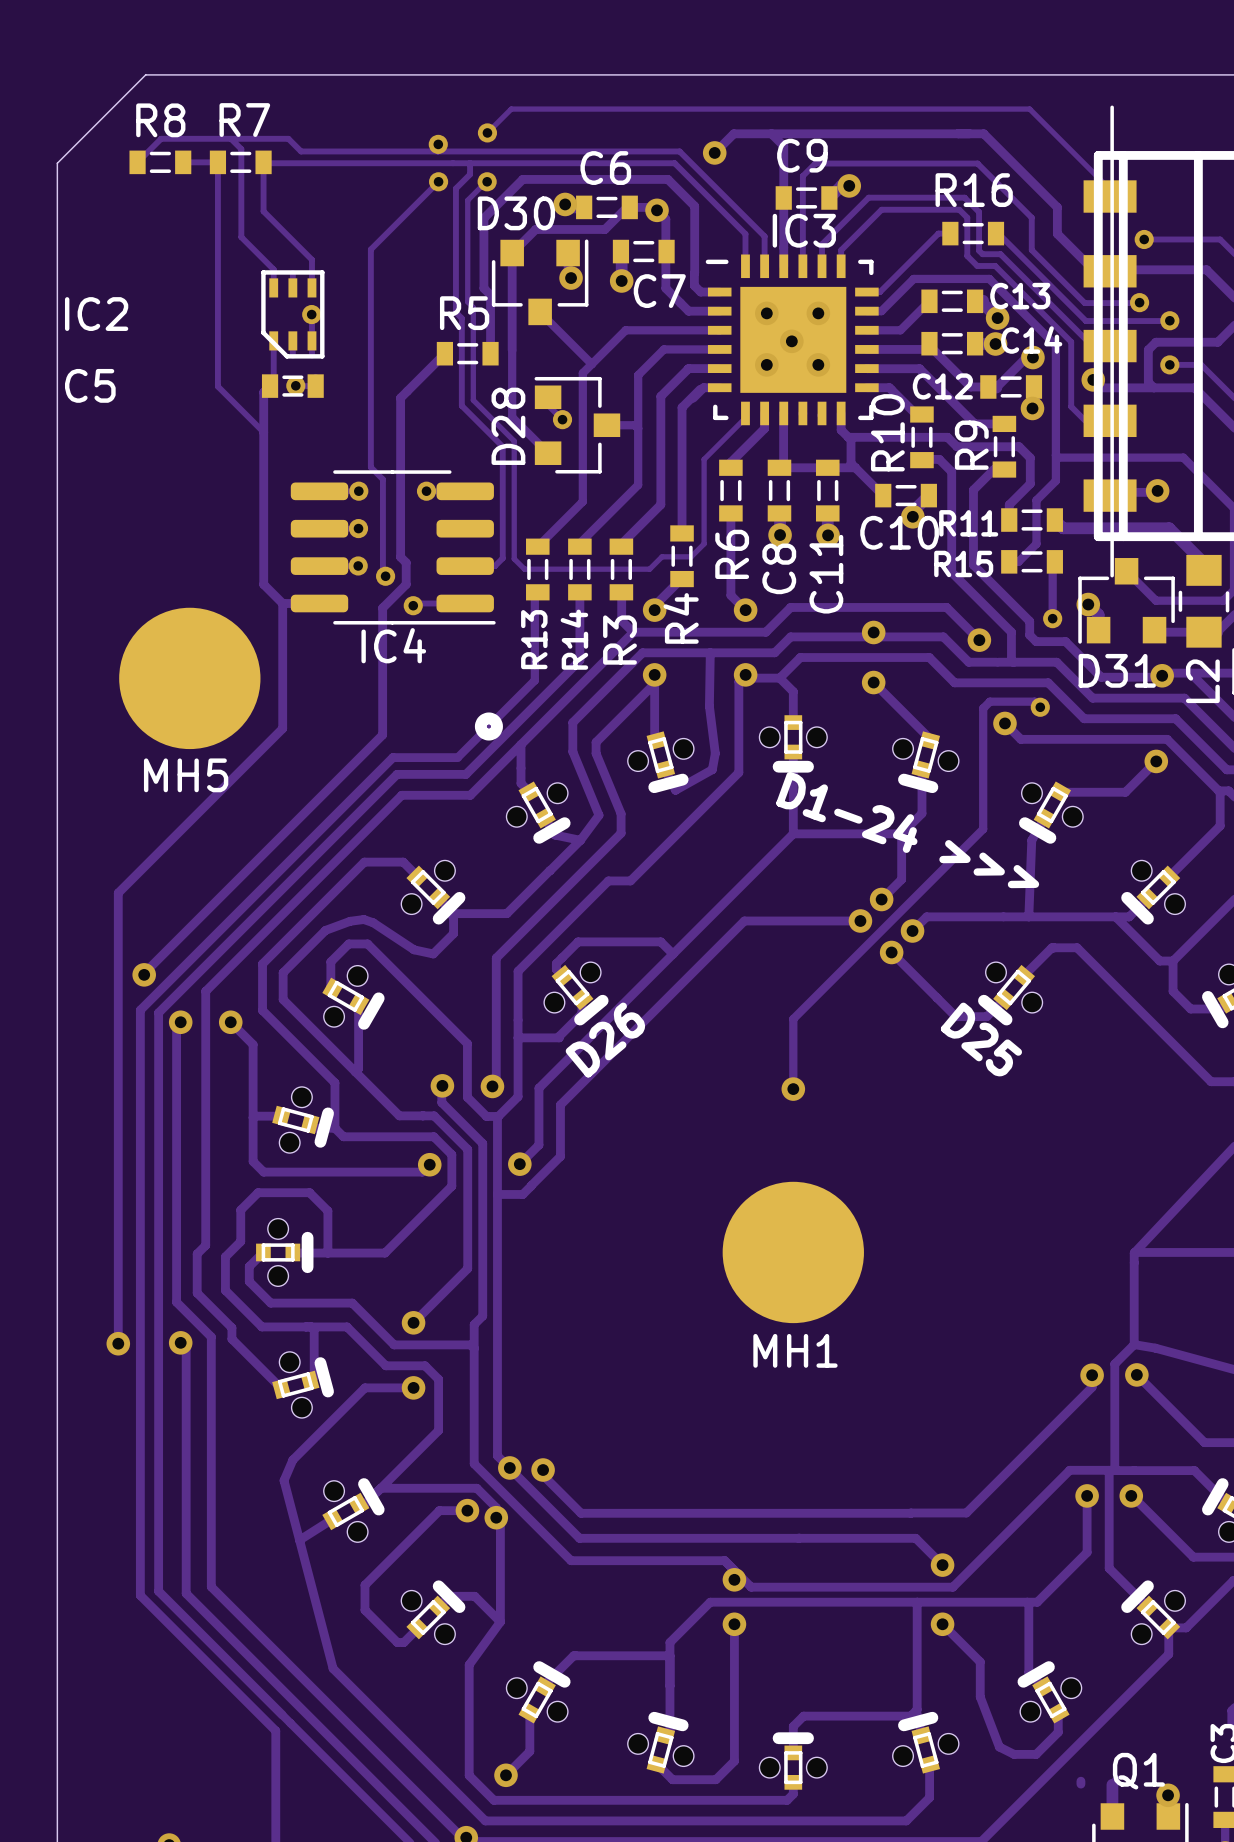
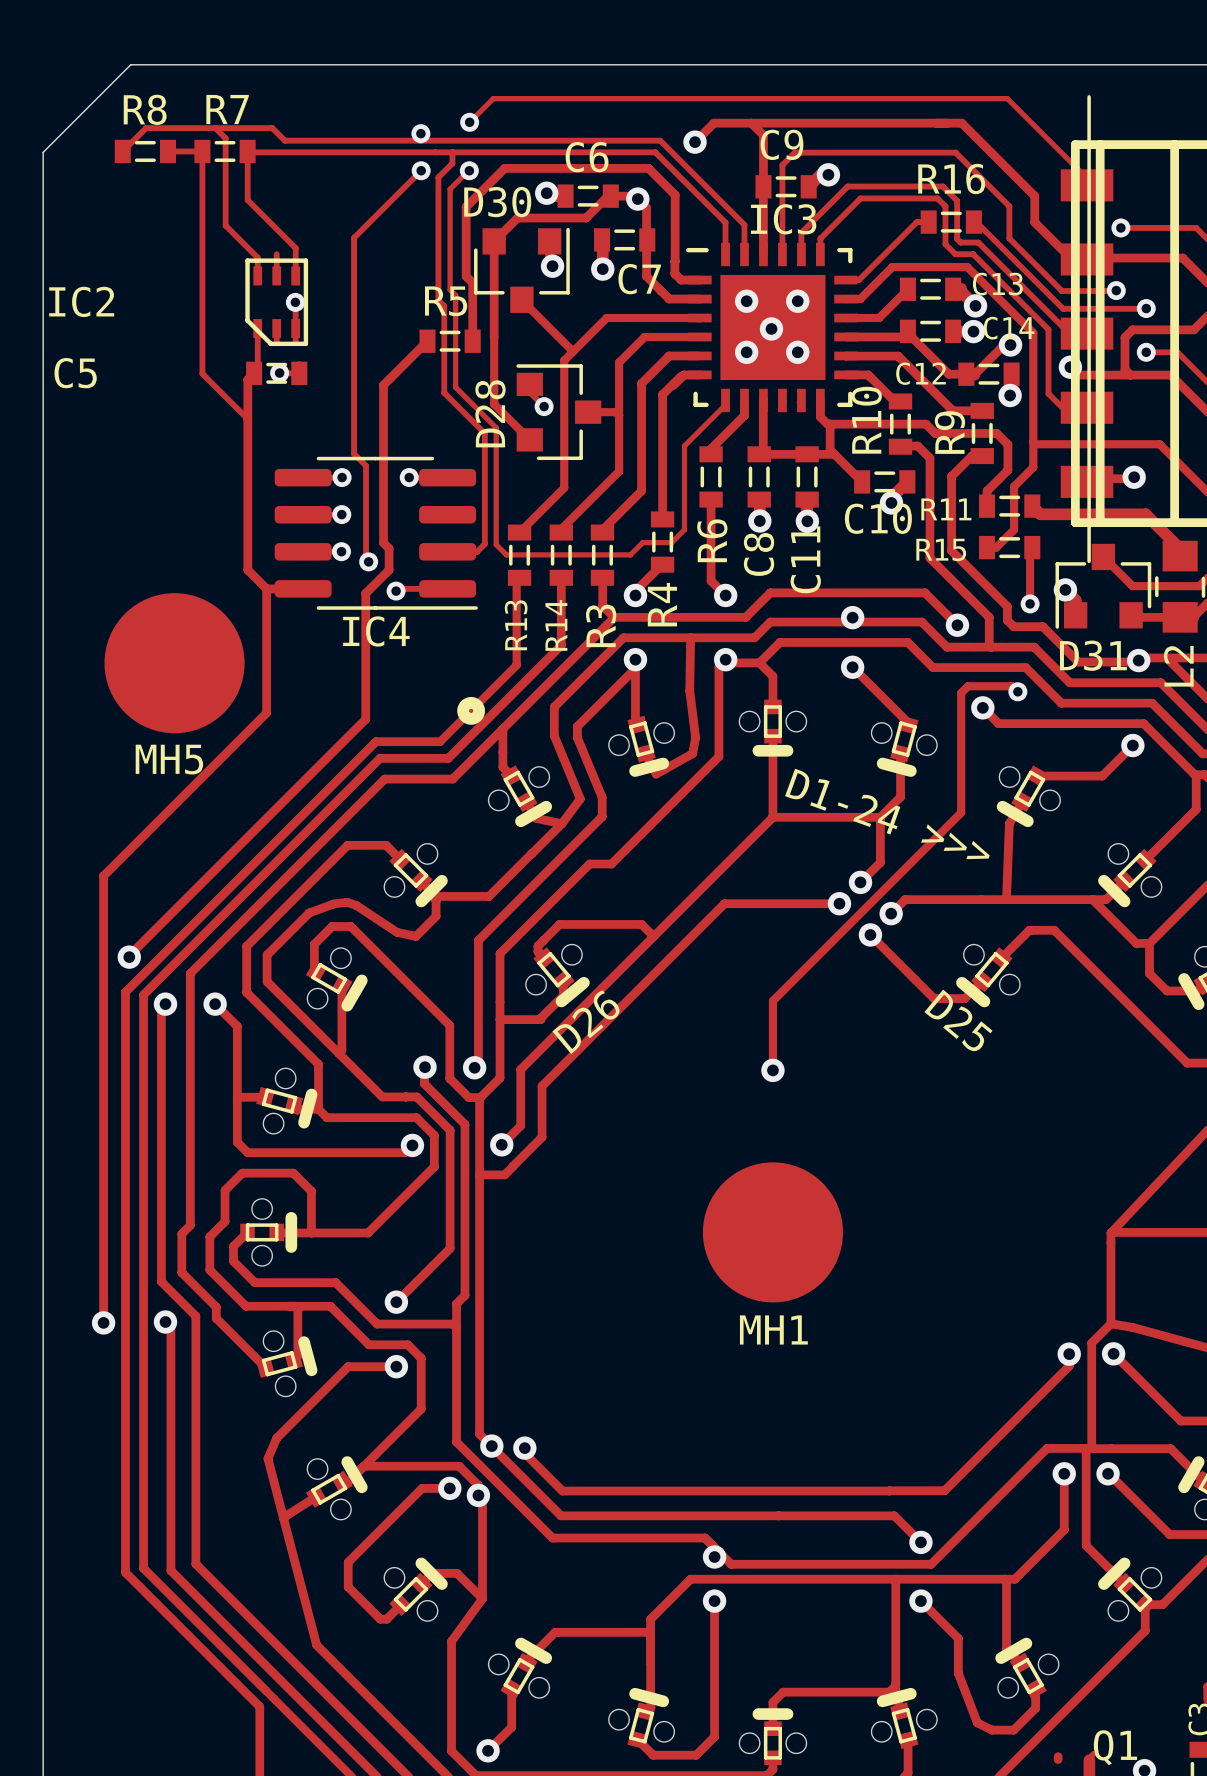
track: none -> (276, 254) (276, 261)

